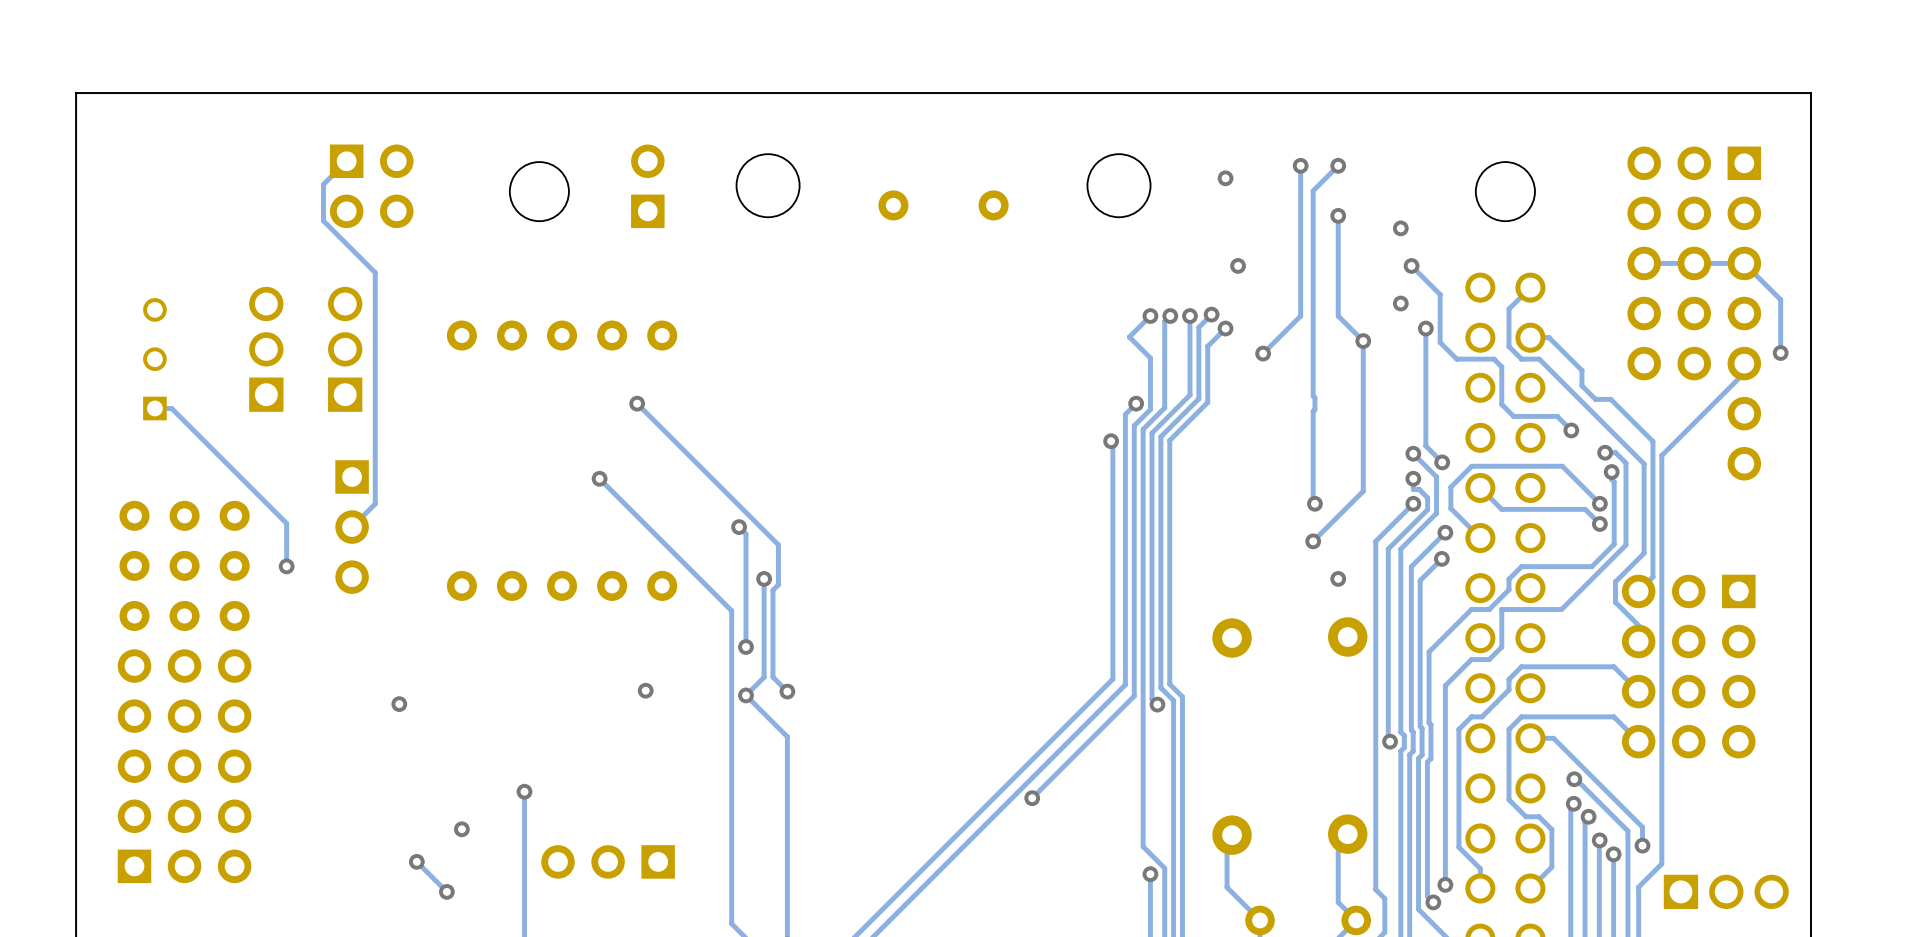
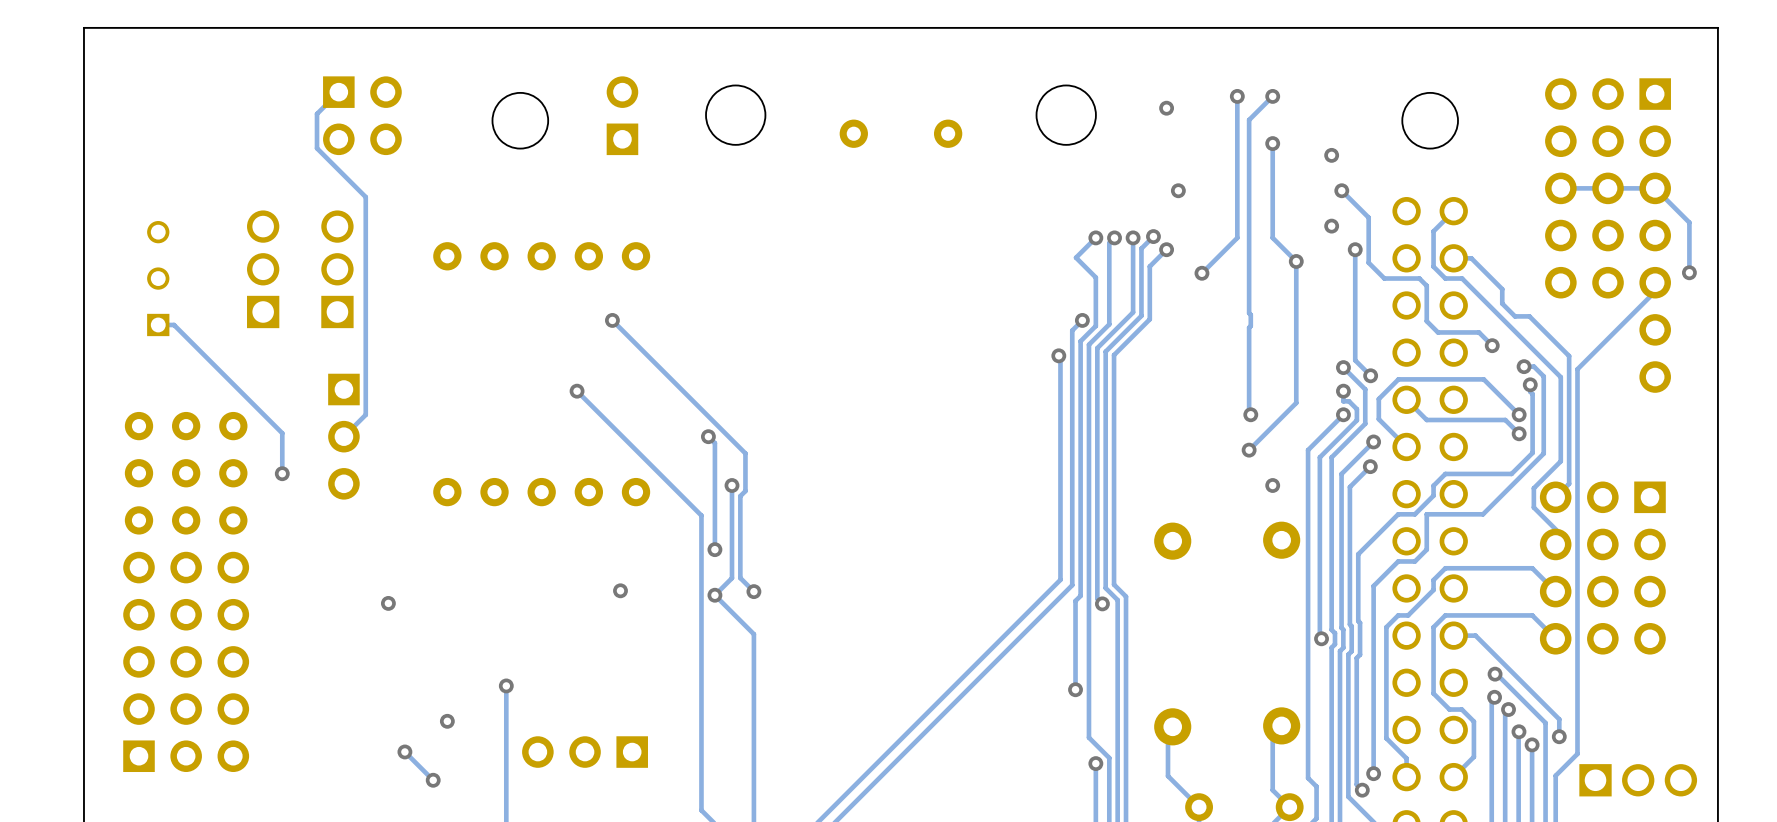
track: (1128, 701) (1032, 798) -> (1075, 600) (1075, 689)
via position: (1032, 798) -> (1075, 689)

